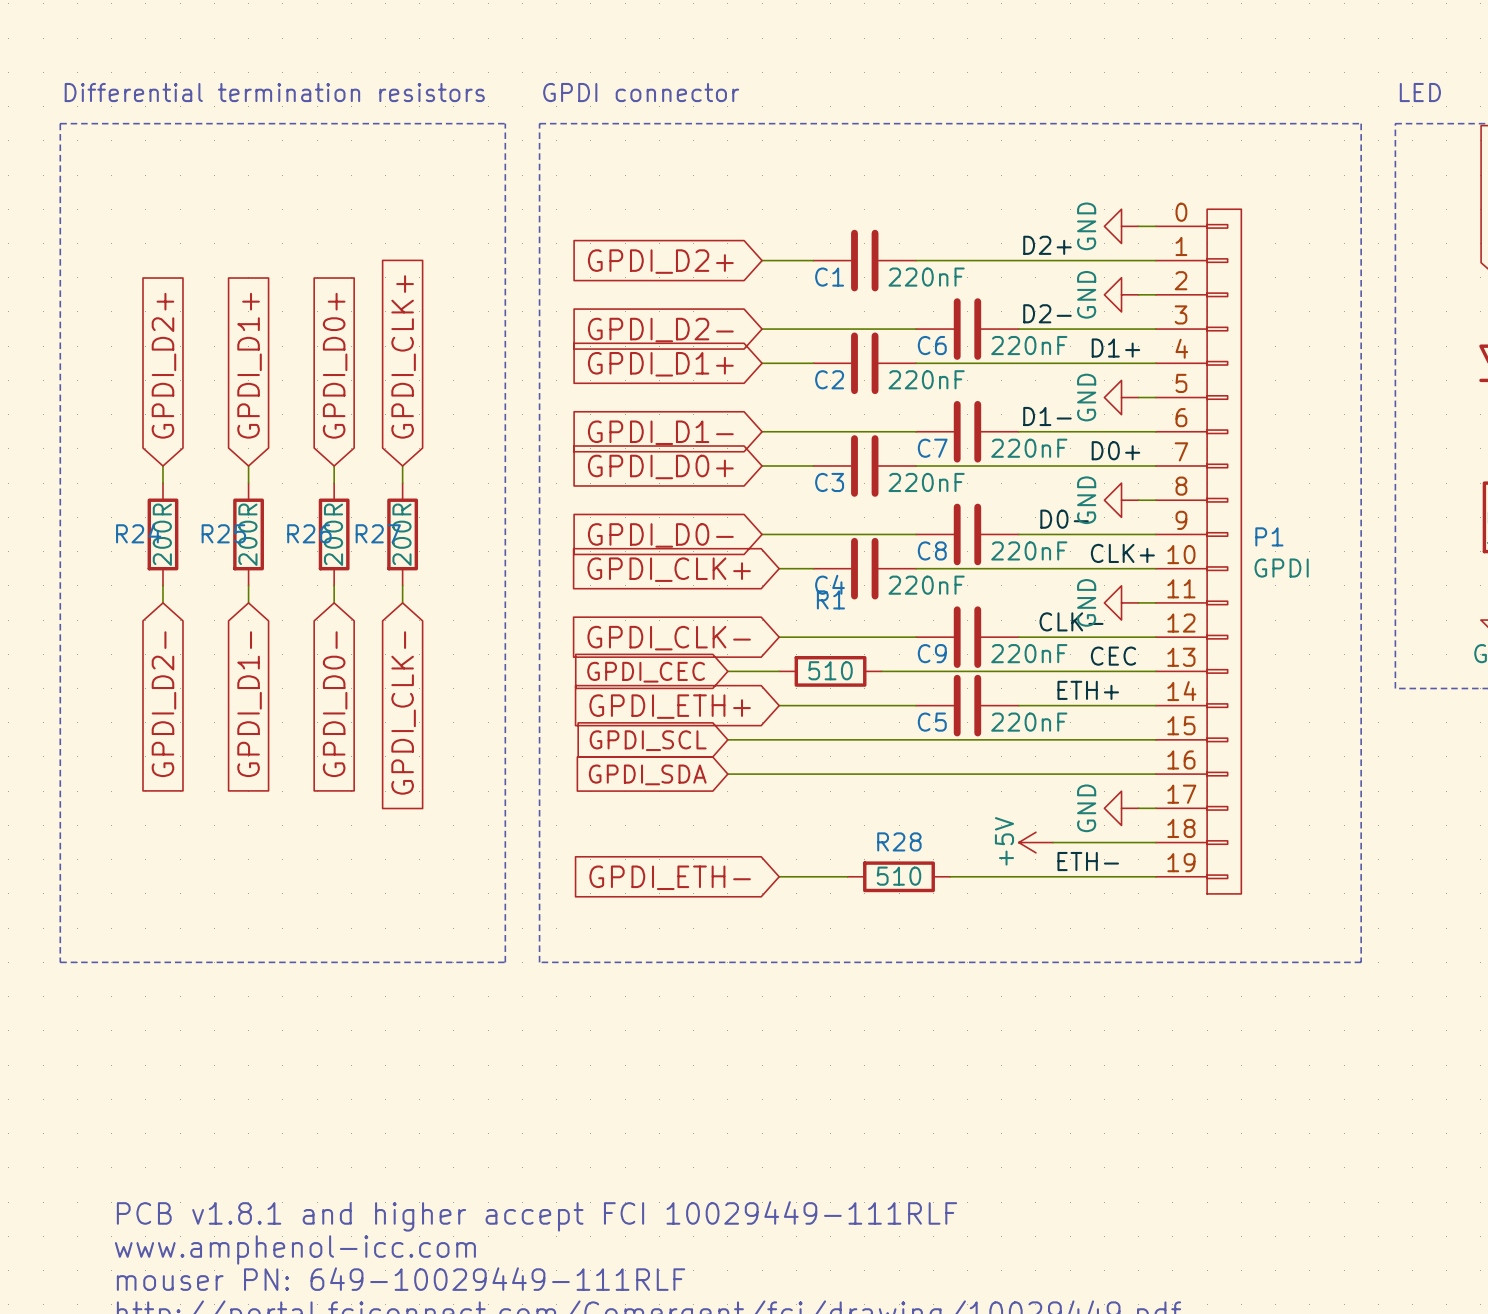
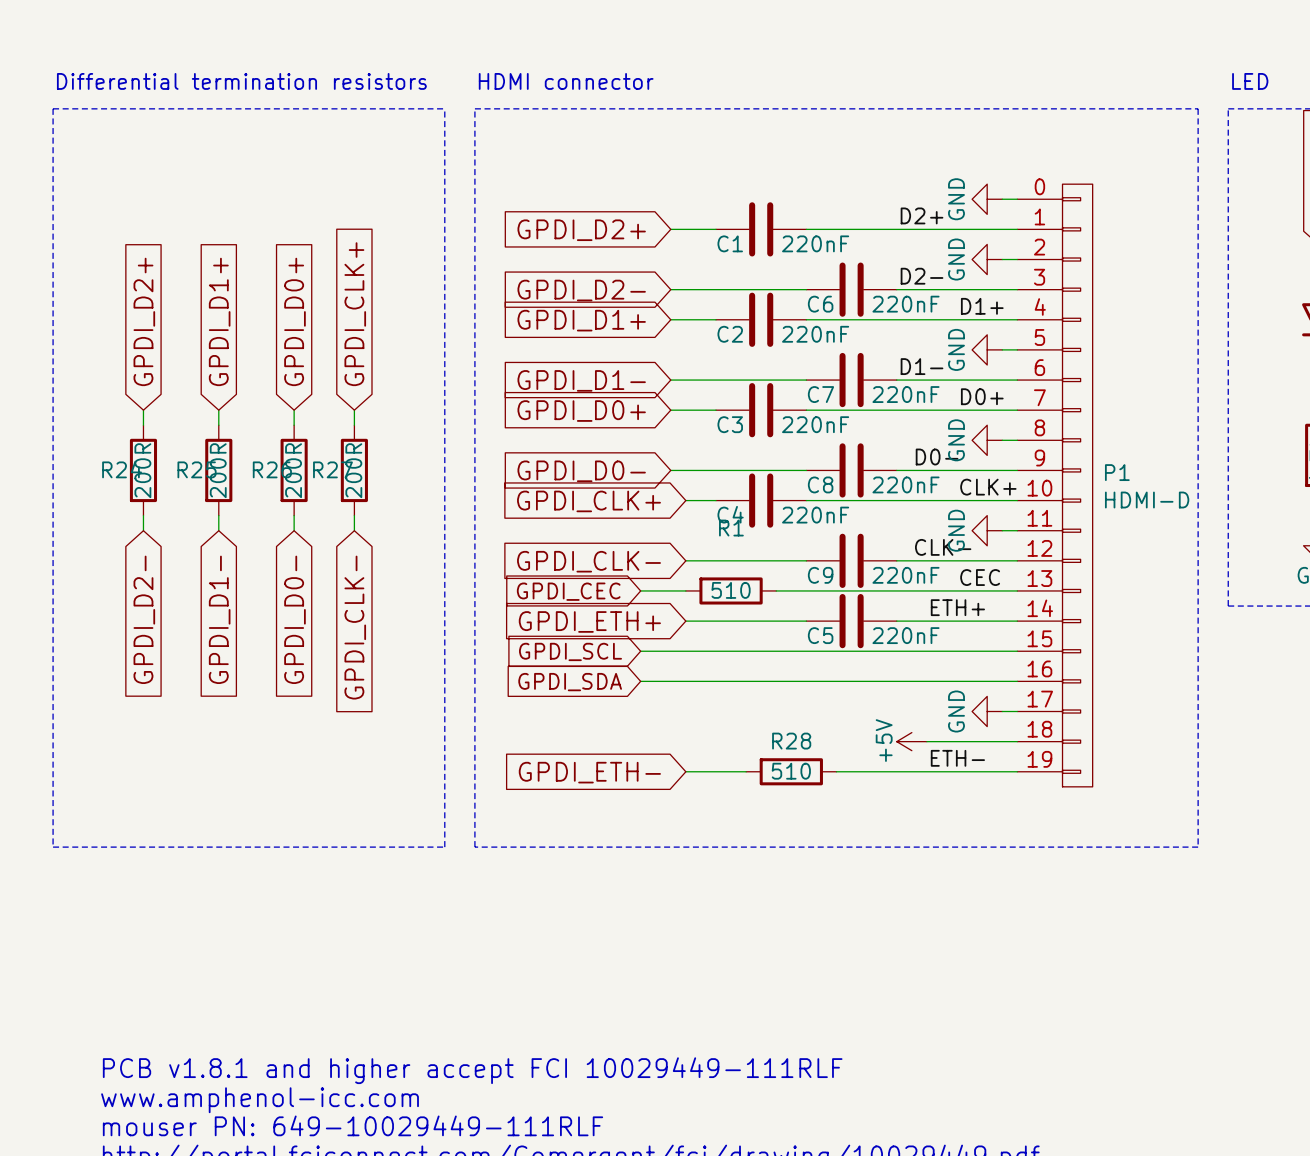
text: GPDI connector (641, 92) -> HDMI connector (566, 81)
P1 value: GPDI (1281, 568) -> HDMI-D (1147, 500)

